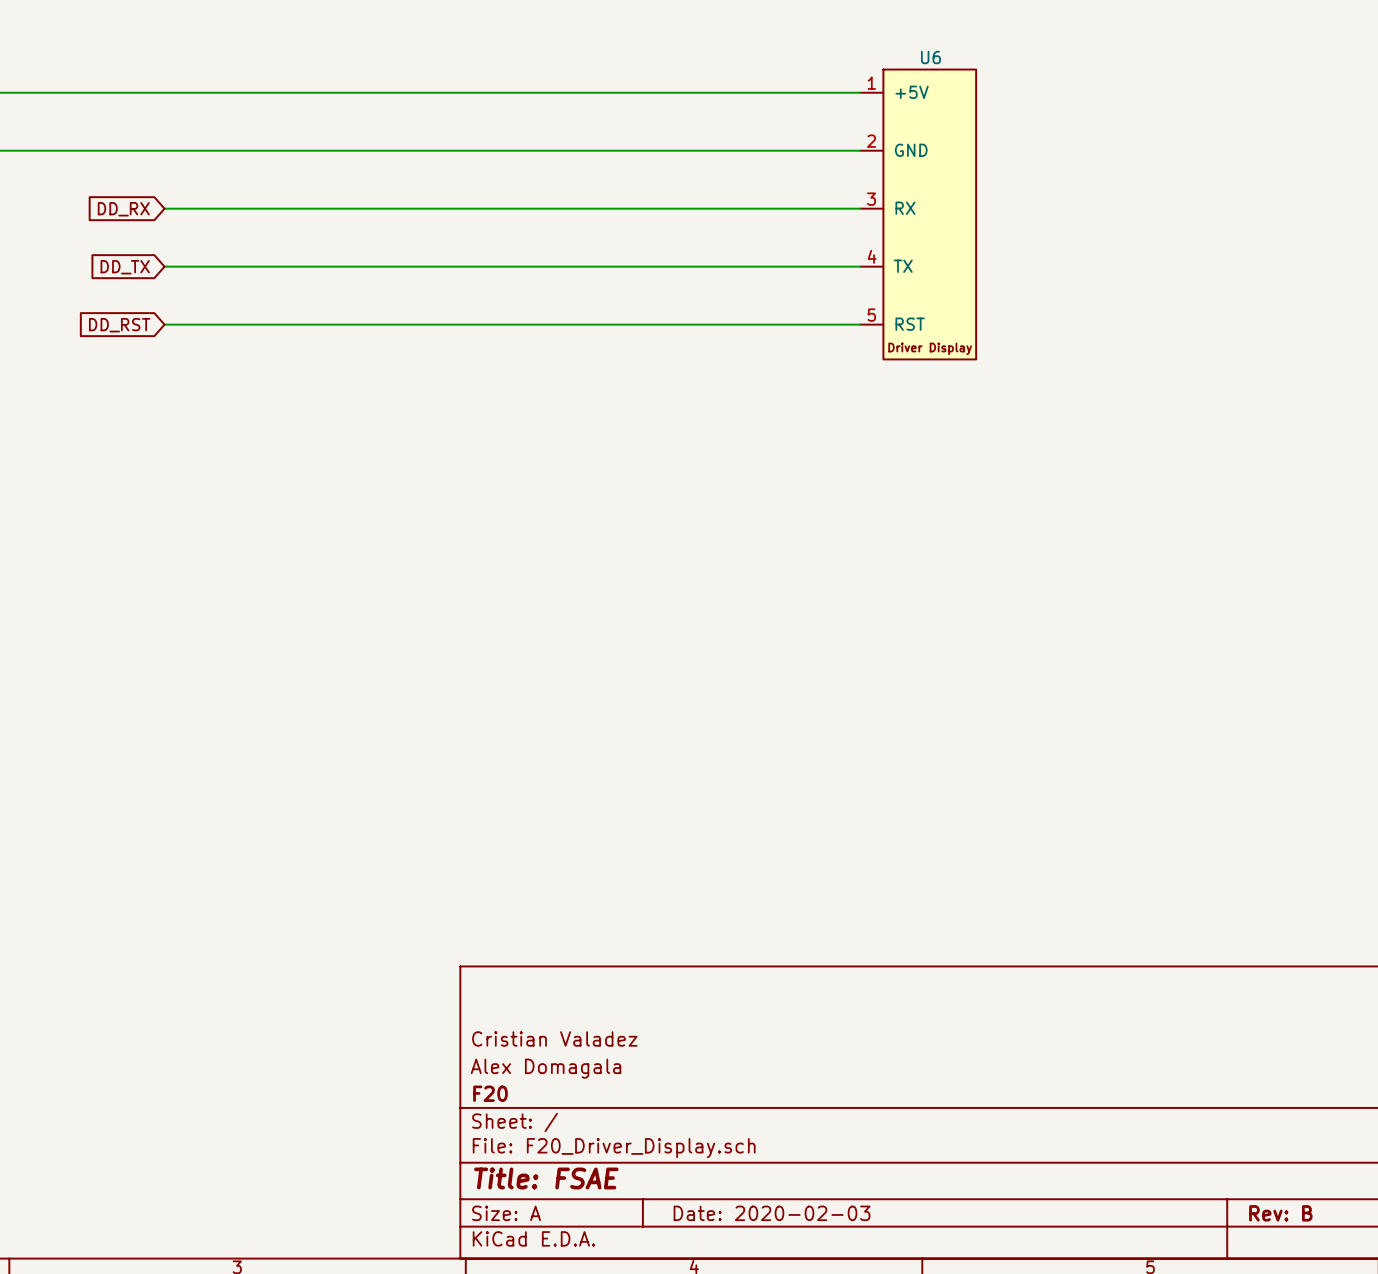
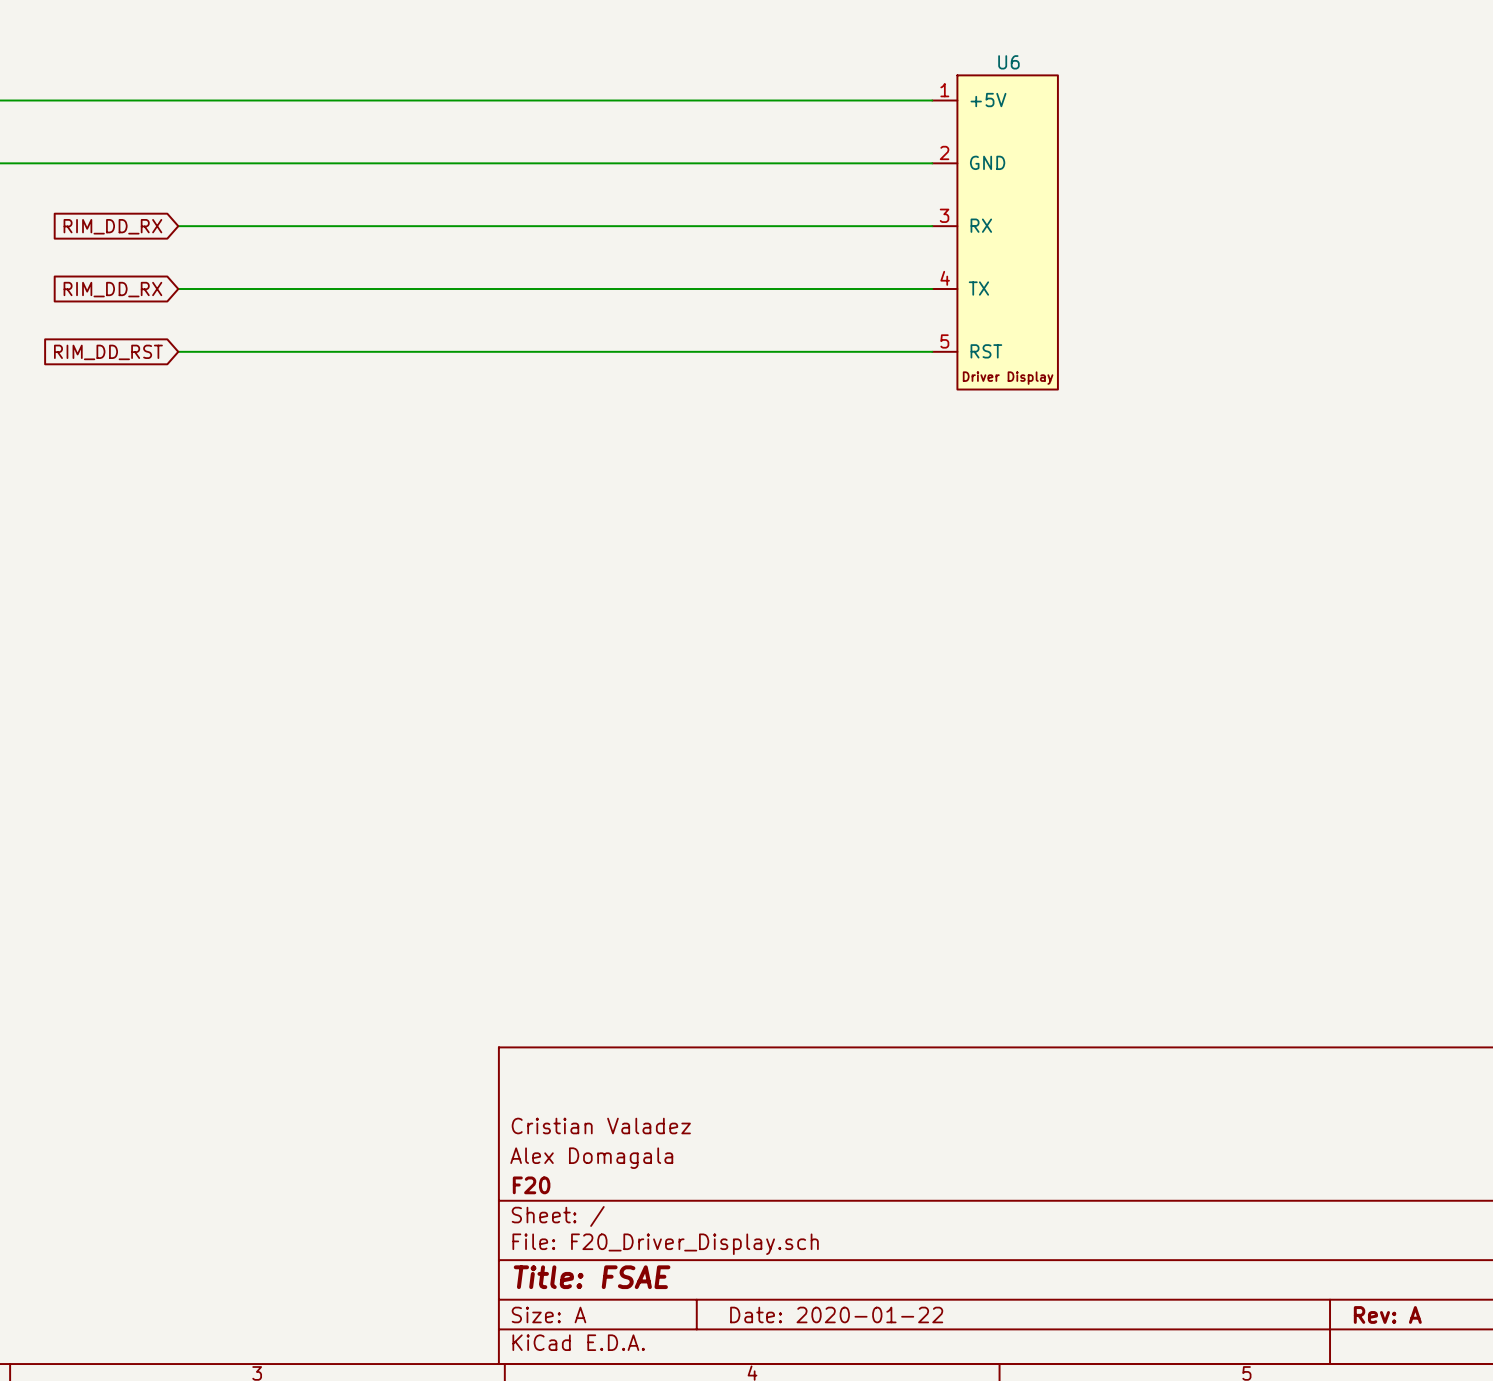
global label: DD_RX (123, 209) -> RIM_DD_RX (112, 226)
global label: DD_TX (125, 267) -> RIM_DD_RX (112, 289)
global label: DD_RST (119, 325) -> RIM_DD_RST (108, 352)
title block: Date: 2020-02-03 (771, 1213) -> Date: 2020-01-22 (836, 1314)
title block: Rev: B (1280, 1213) -> Rev: A (1387, 1314)

